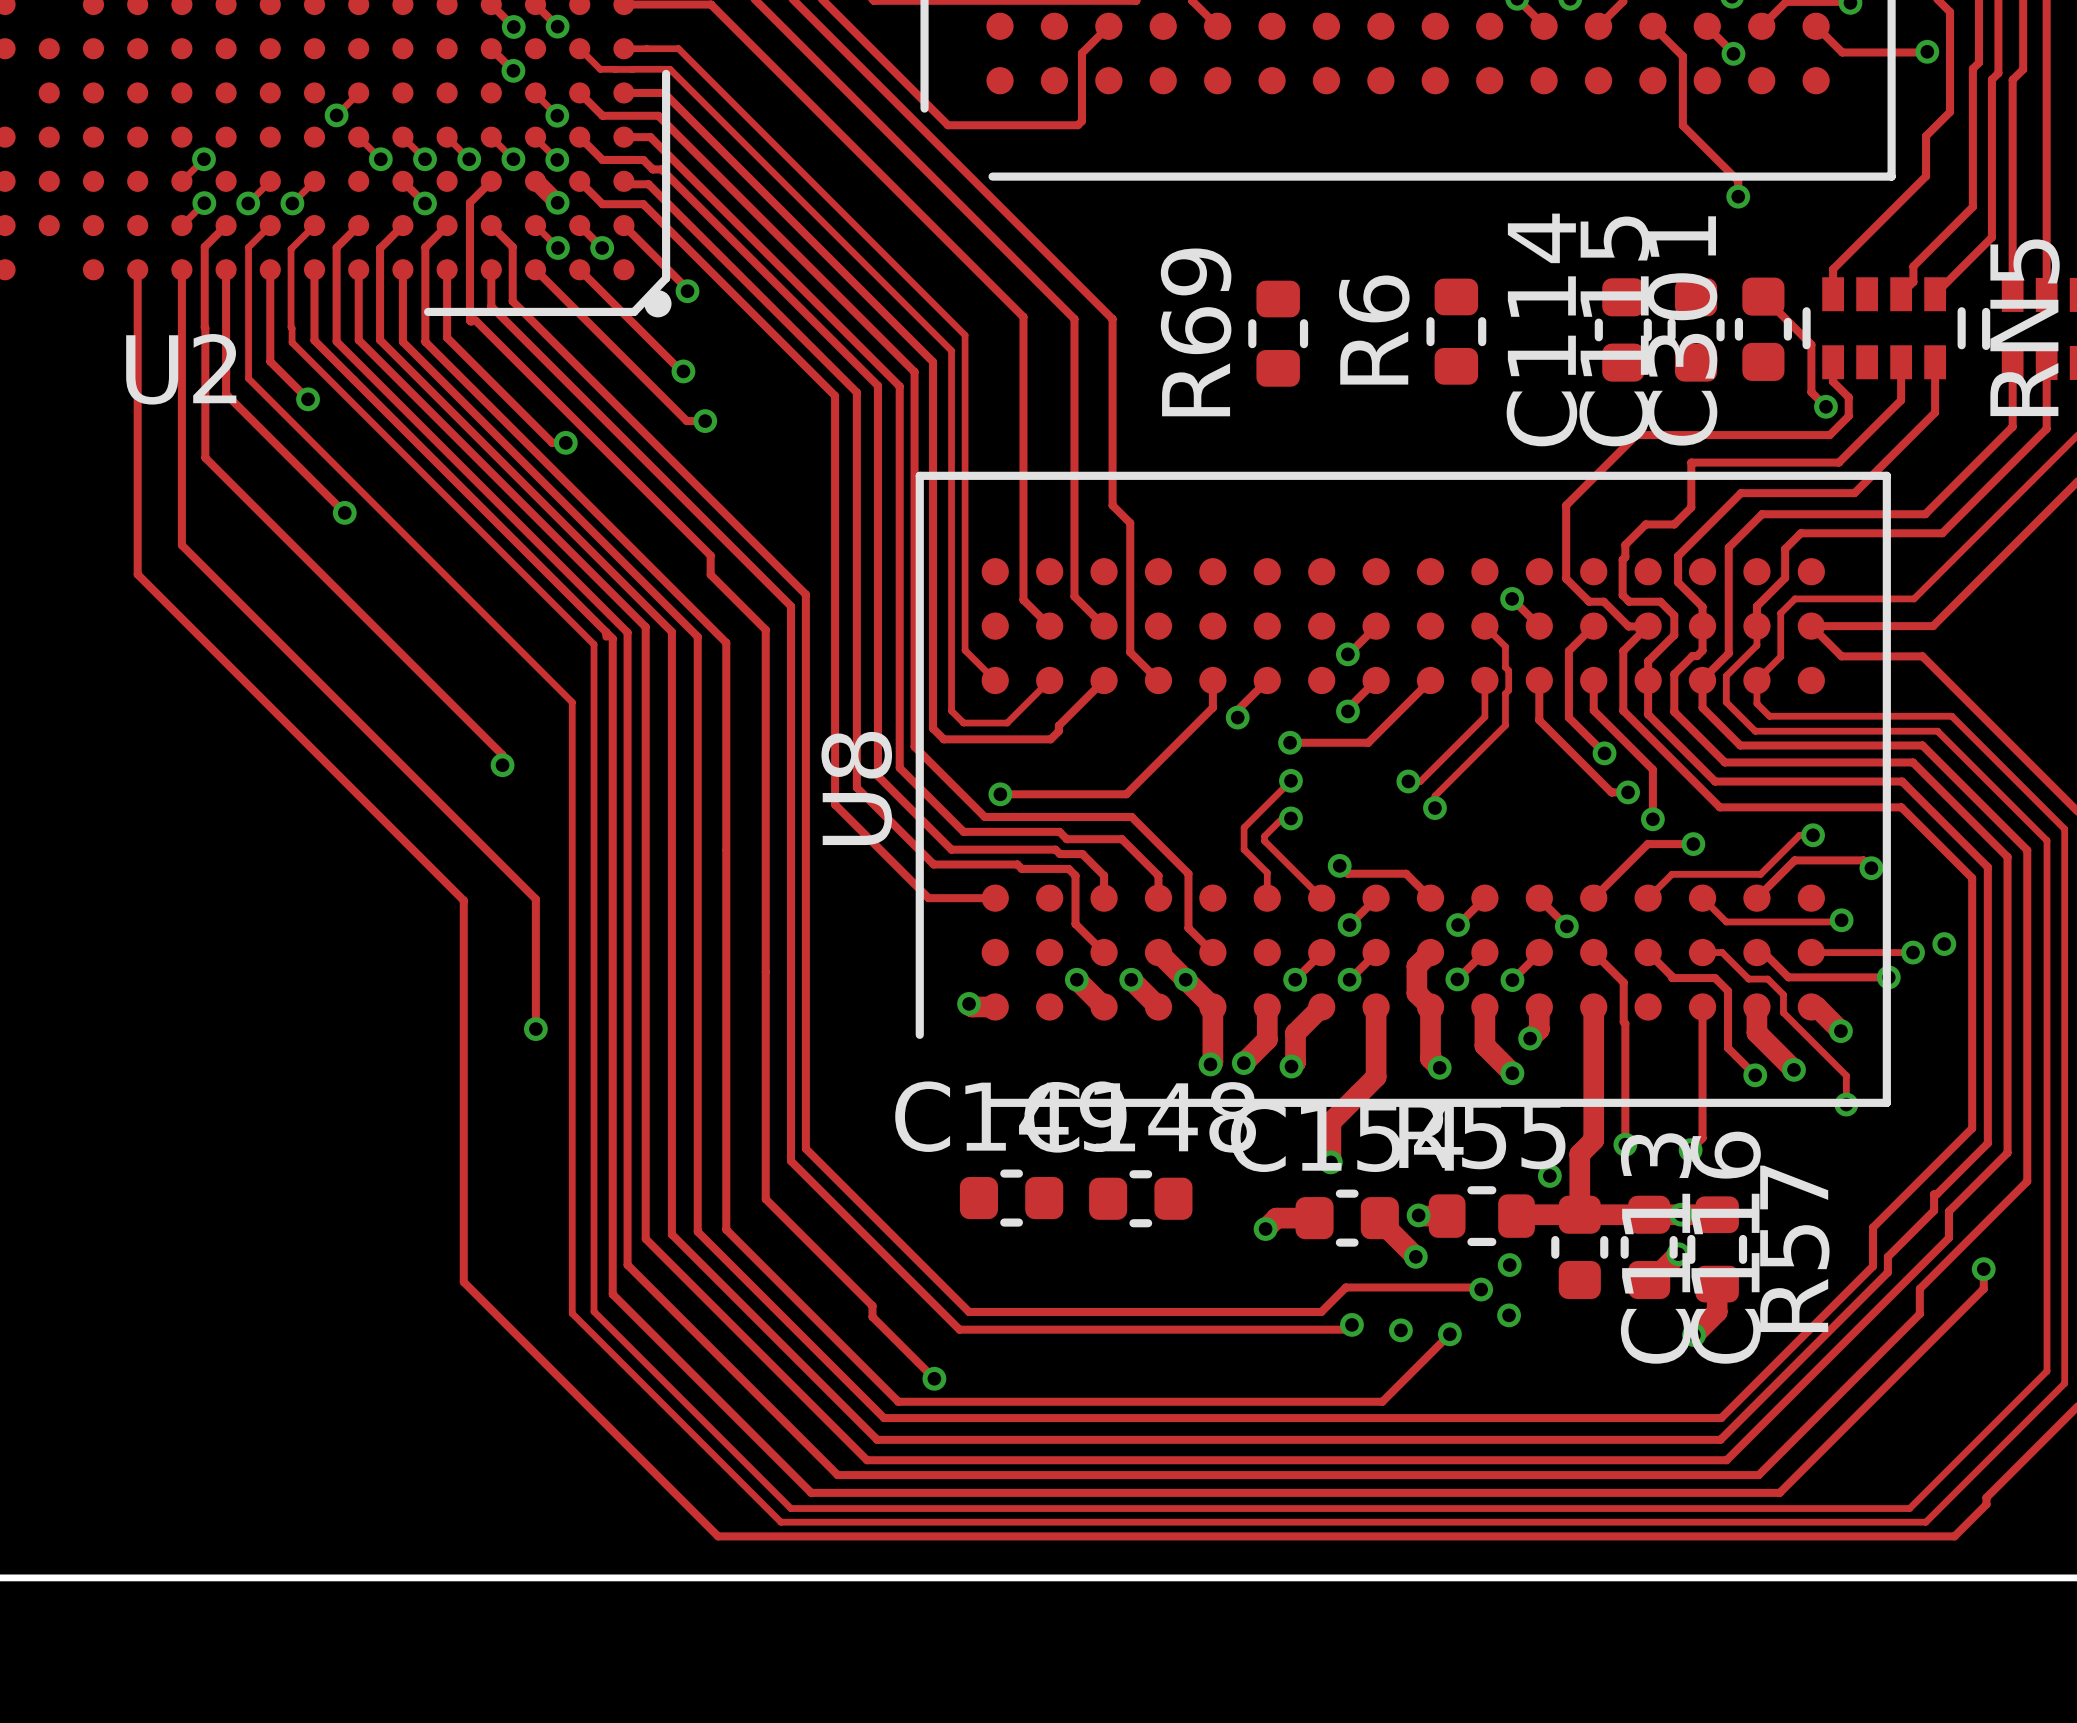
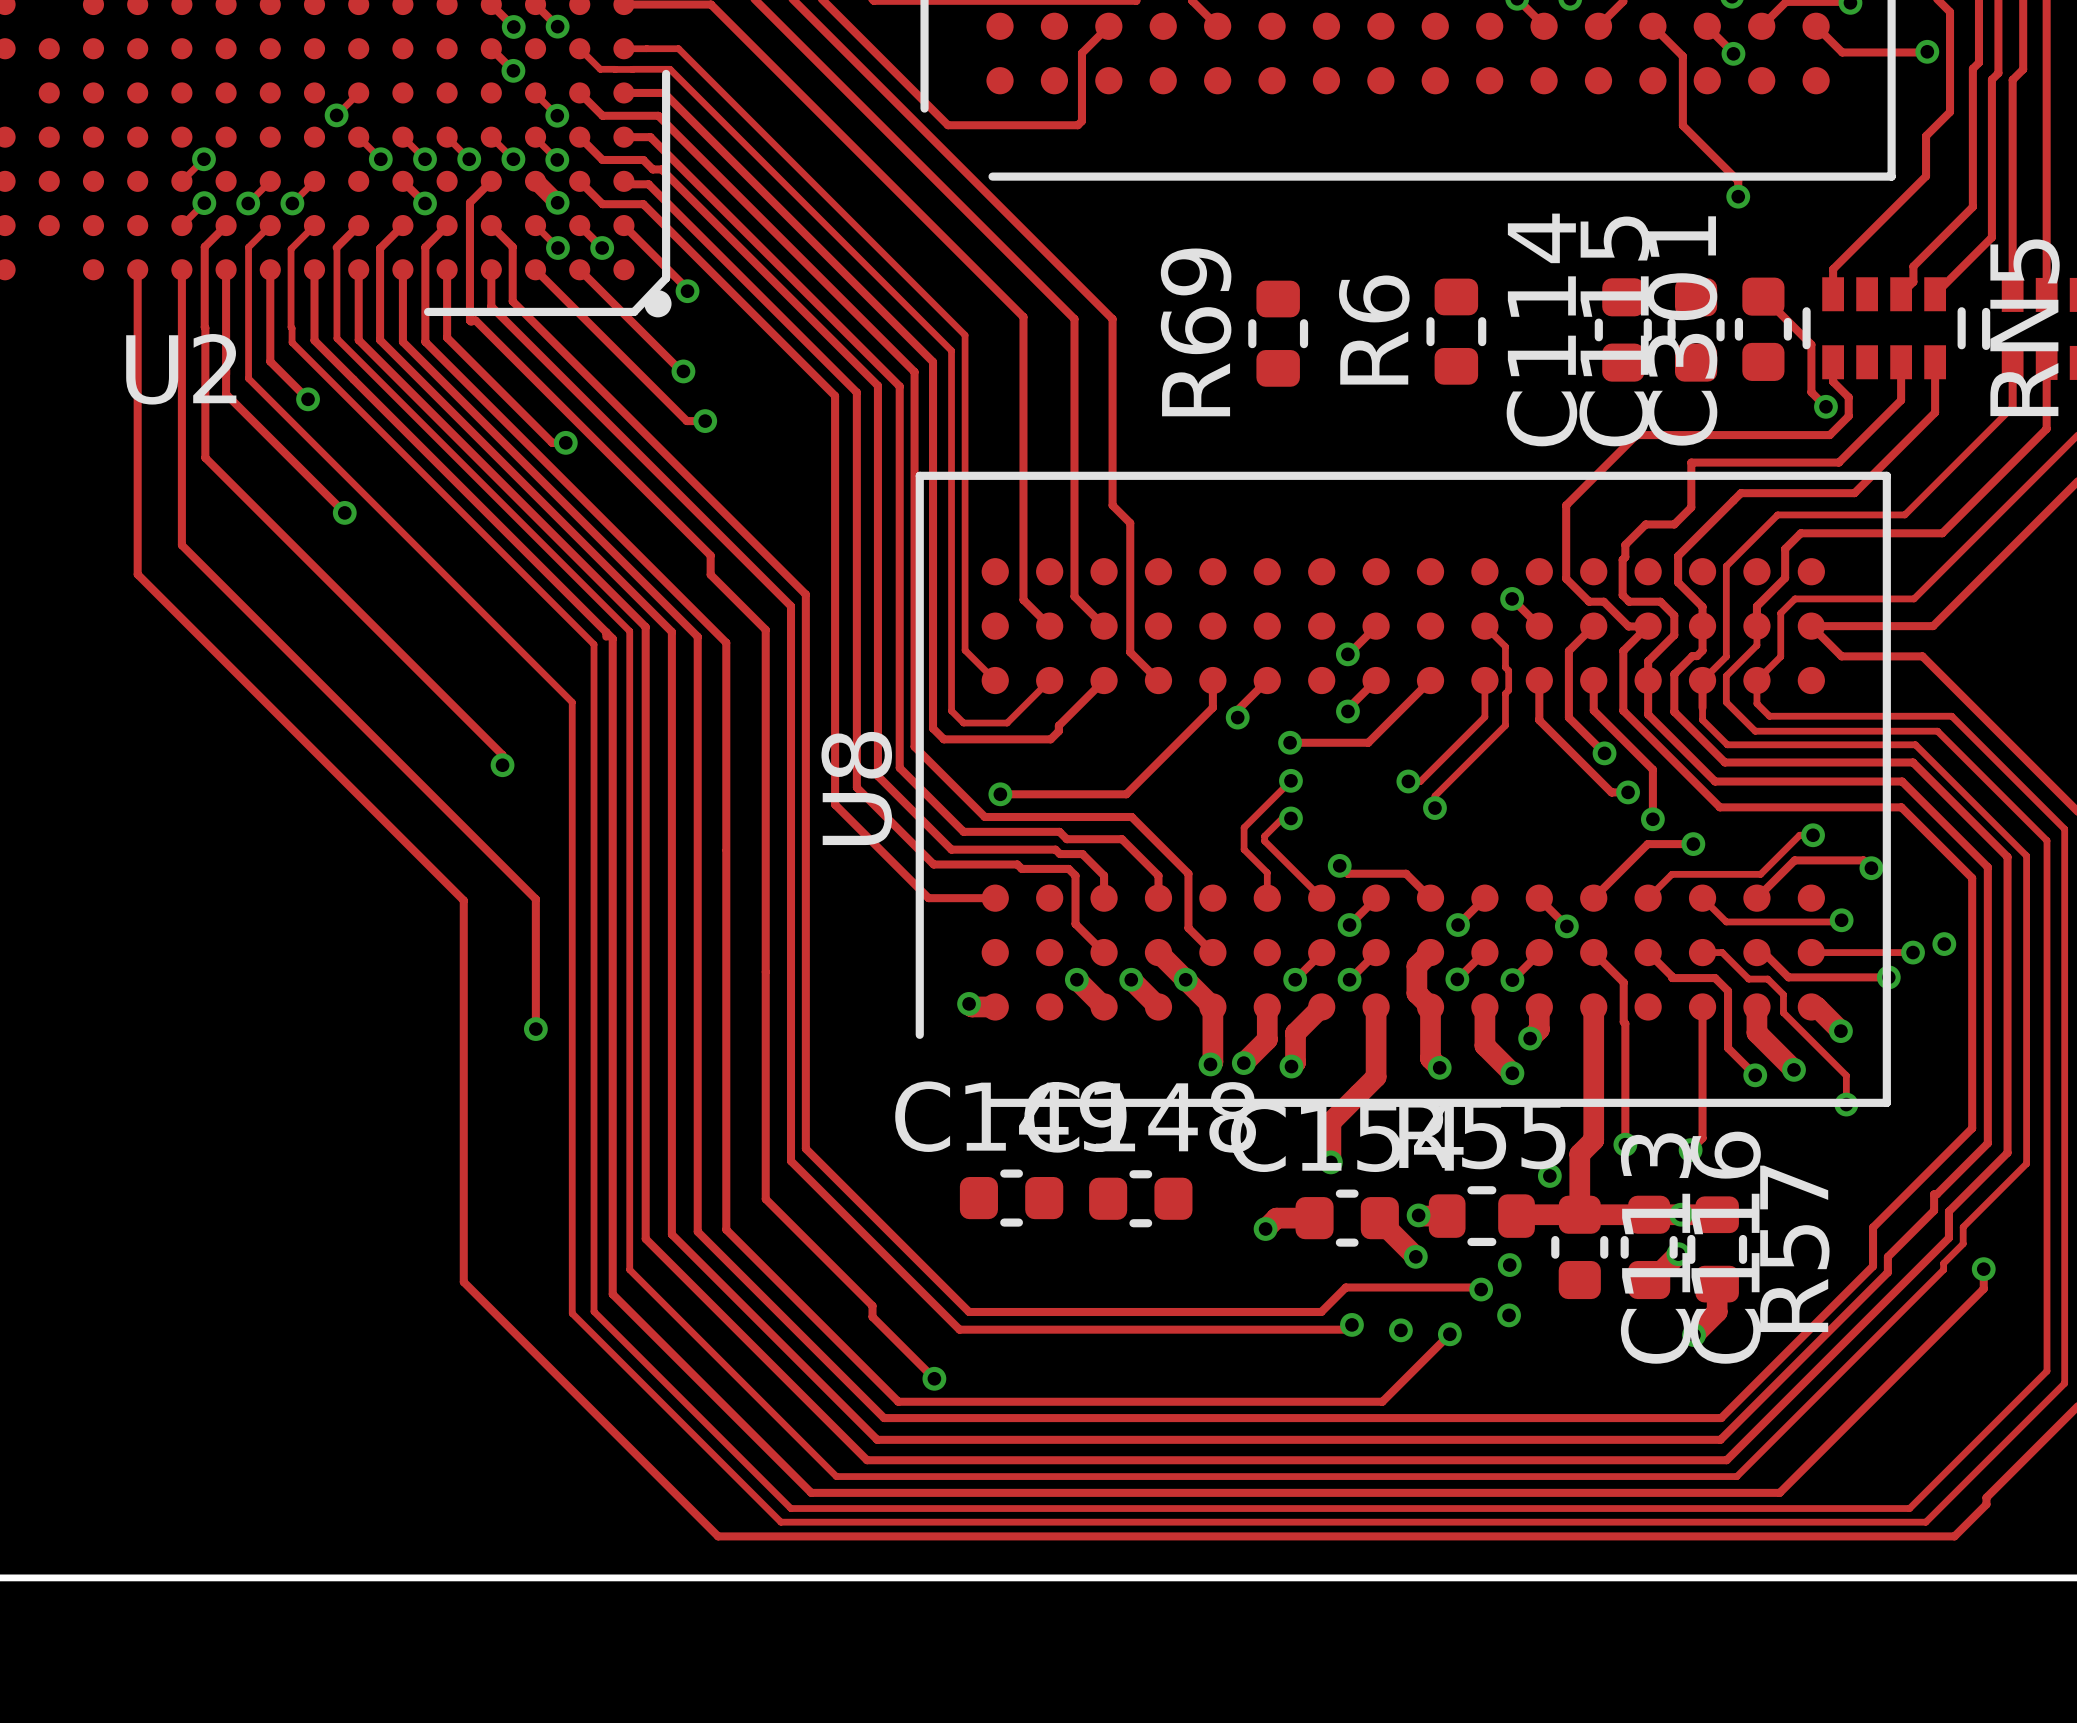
track: (336, 247) (336, 341) (627, 632) (627, 1264) (837, 1475) (1758, 1475) (1919, 1314) (1919, 1288) (2027, 1181) (2027, 850) (1922, 745) (1740, 745) (1702, 707) -> (336, 247) (336, 338) (629, 631) (629, 1269) (836, 1476) (1736, 1476) (1943, 1269) (1943, 1263) (1963, 1243) (1963, 1227) (2026, 1163) (2026, 855) (1915, 744) (1727, 744) (1702, 719) (1702, 707)
track: (2012, 407) (2012, 426) (1925, 514) (1762, 514) (1728, 547) (1728, 653) (1702, 679) -> (2012, 407) (1904, 514) (1777, 514) (1726, 566) (1726, 656) (1702, 680)

